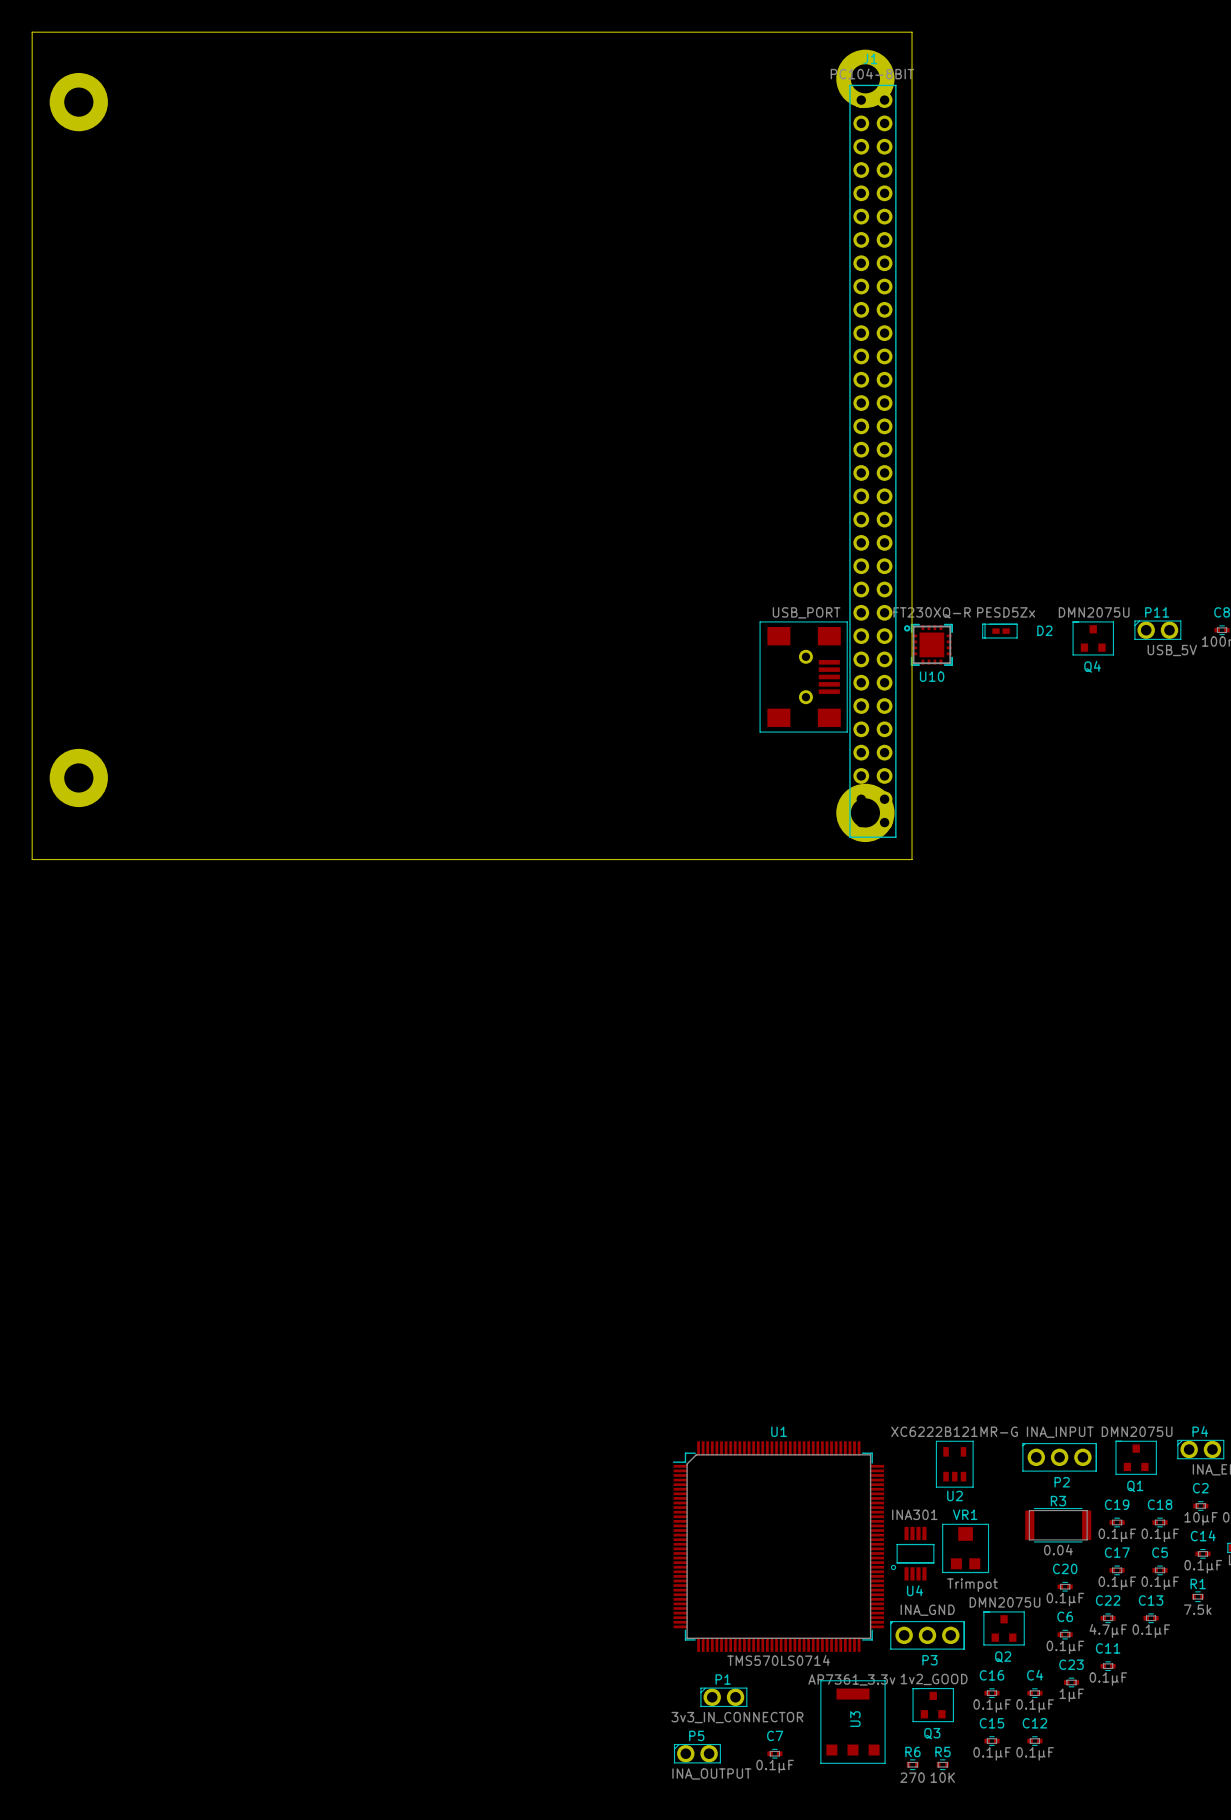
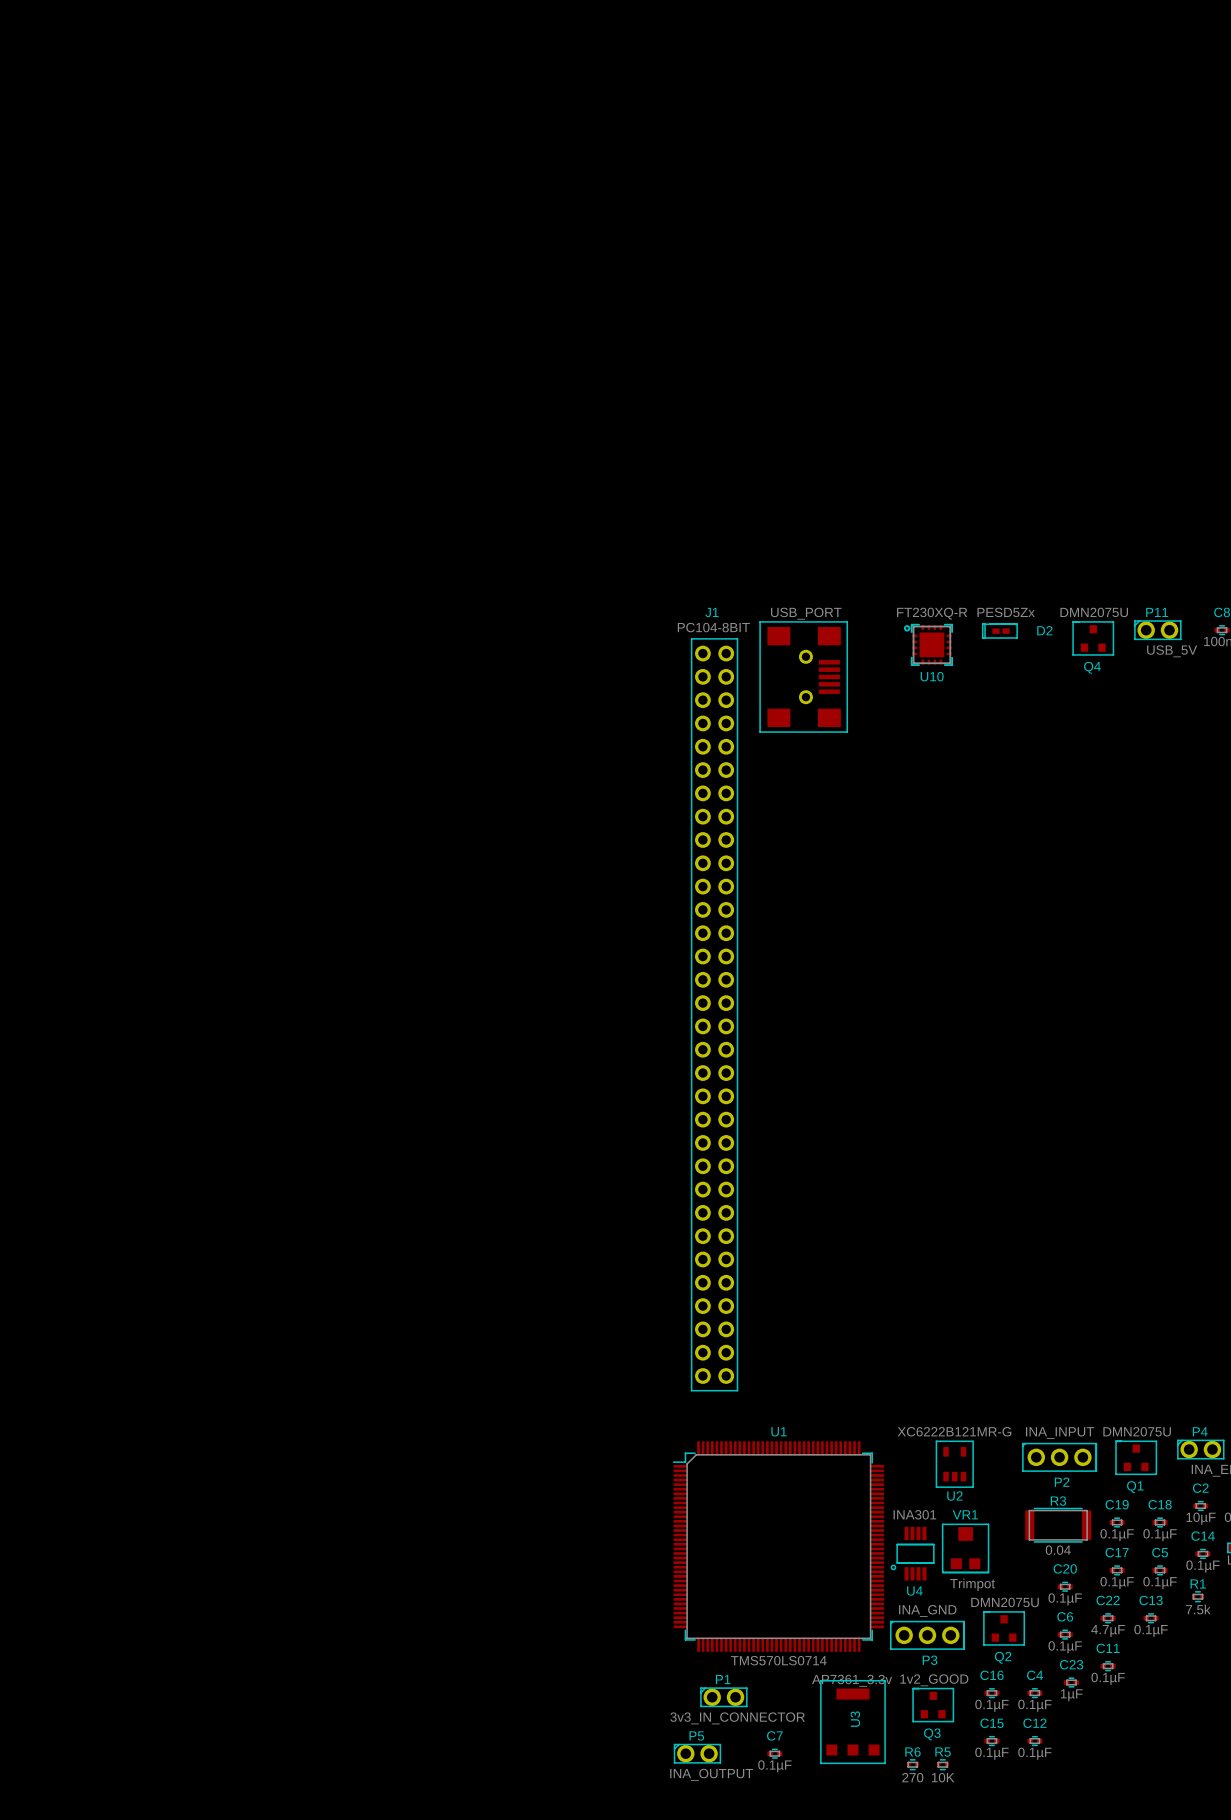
board edge: (32, 32) (912, 32) (912, 859) (32, 859) (32, 32) -> none
part: (865, 78) -> none
part: (78, 102) -> none
J1 position: (872, 461) -> (714, 1014)
part: (78, 777) -> none
part: (865, 812) -> none

